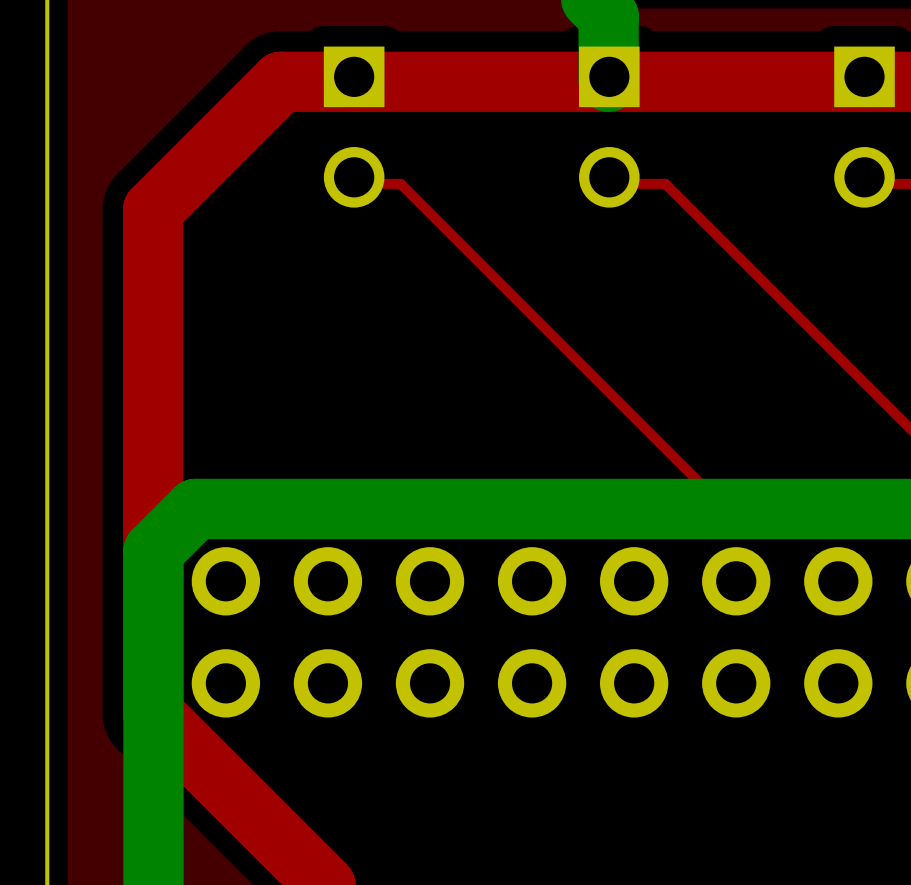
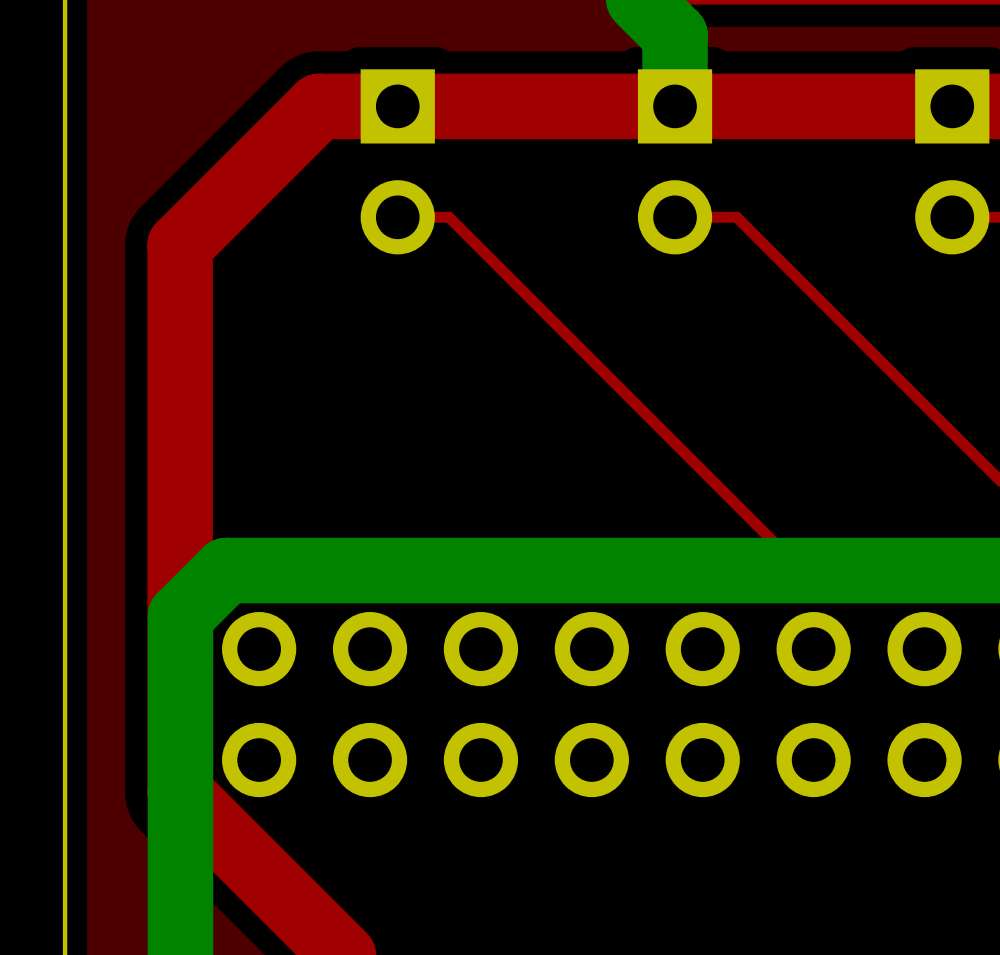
part footprint: [323, 46, 385, 208] -> [360, 69, 435, 255]
part footprint: [579, 46, 640, 208] -> [637, 69, 713, 255]
part footprint: [834, 46, 895, 208] -> [915, 69, 990, 255]

